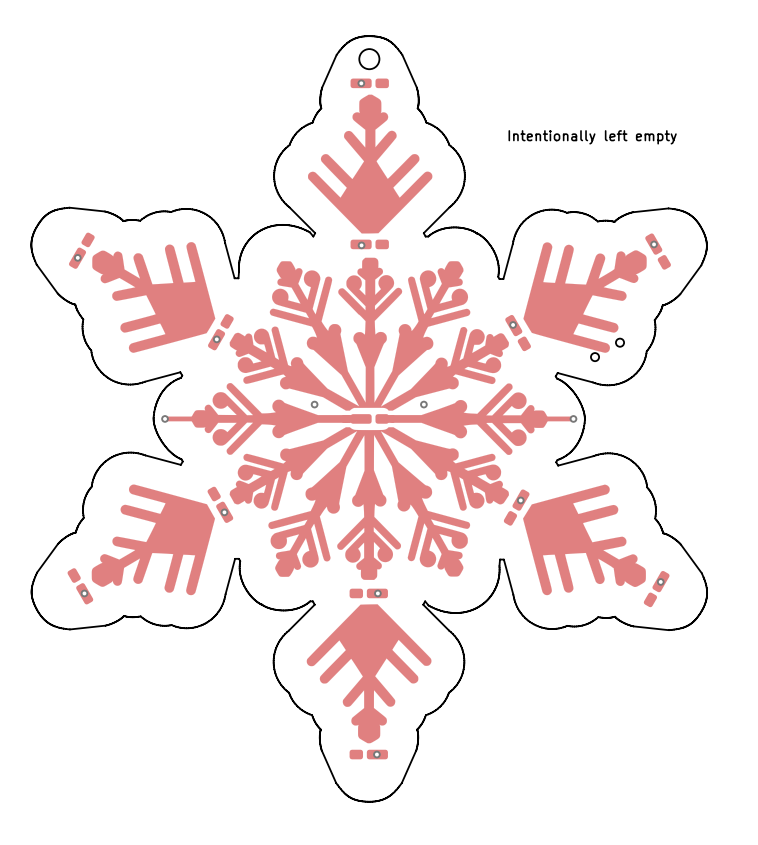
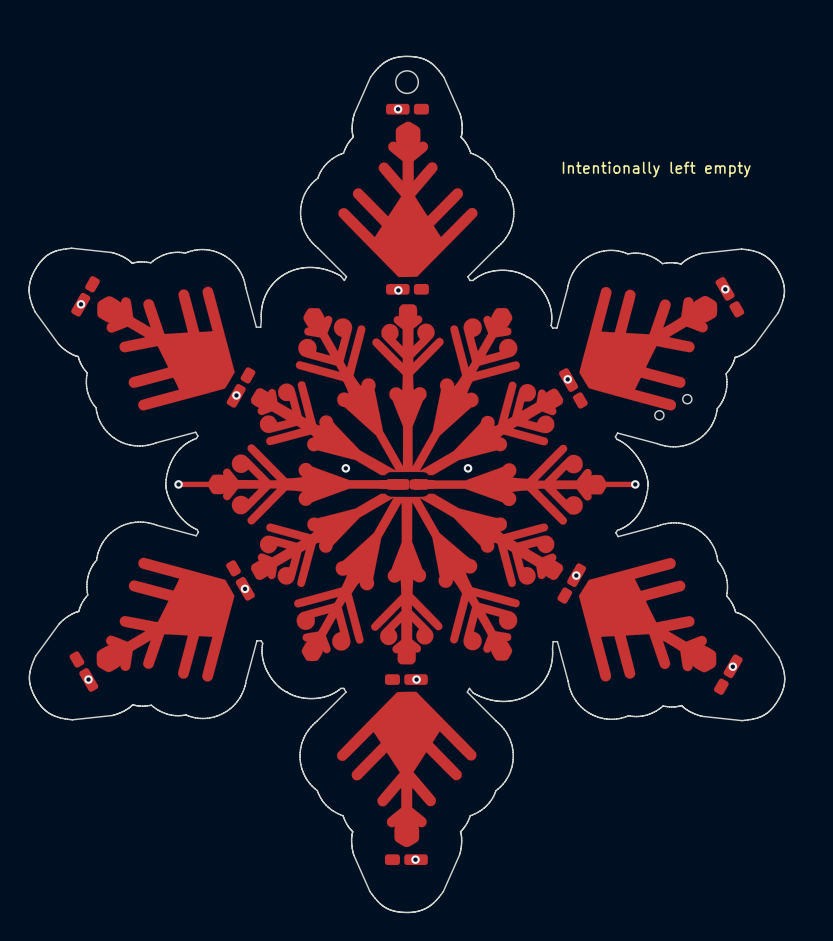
part footprint: [30, 35, 708, 803] -> [28, 55, 786, 913]

